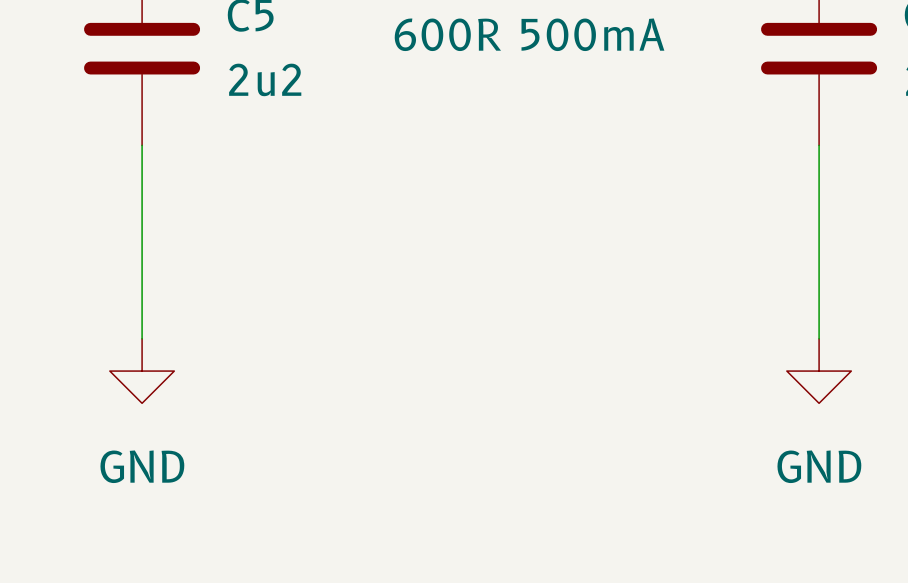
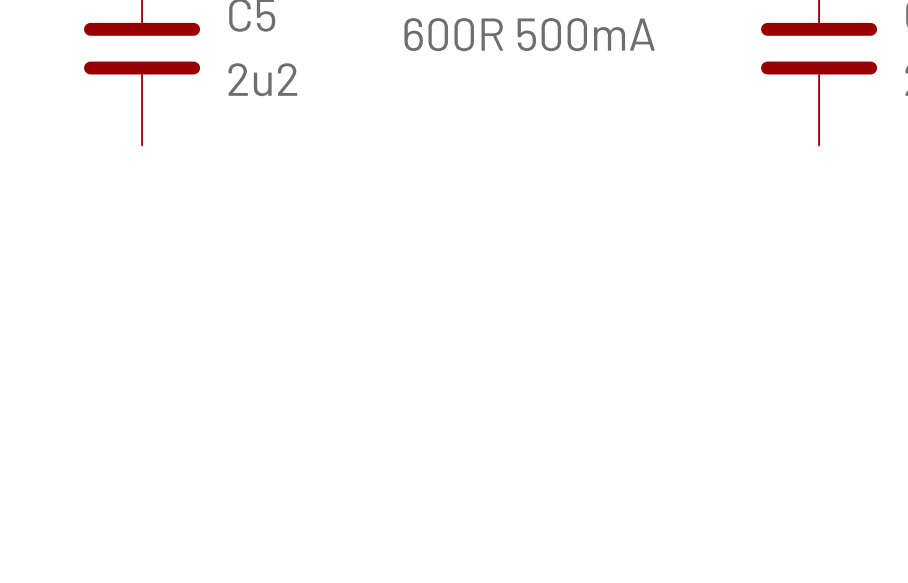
wire: (142, 145) (142, 338) -> none
wire: (819, 145) (819, 338) -> none
power symbol: GND (142, 371) -> none
power symbol: GND (819, 371) -> none

